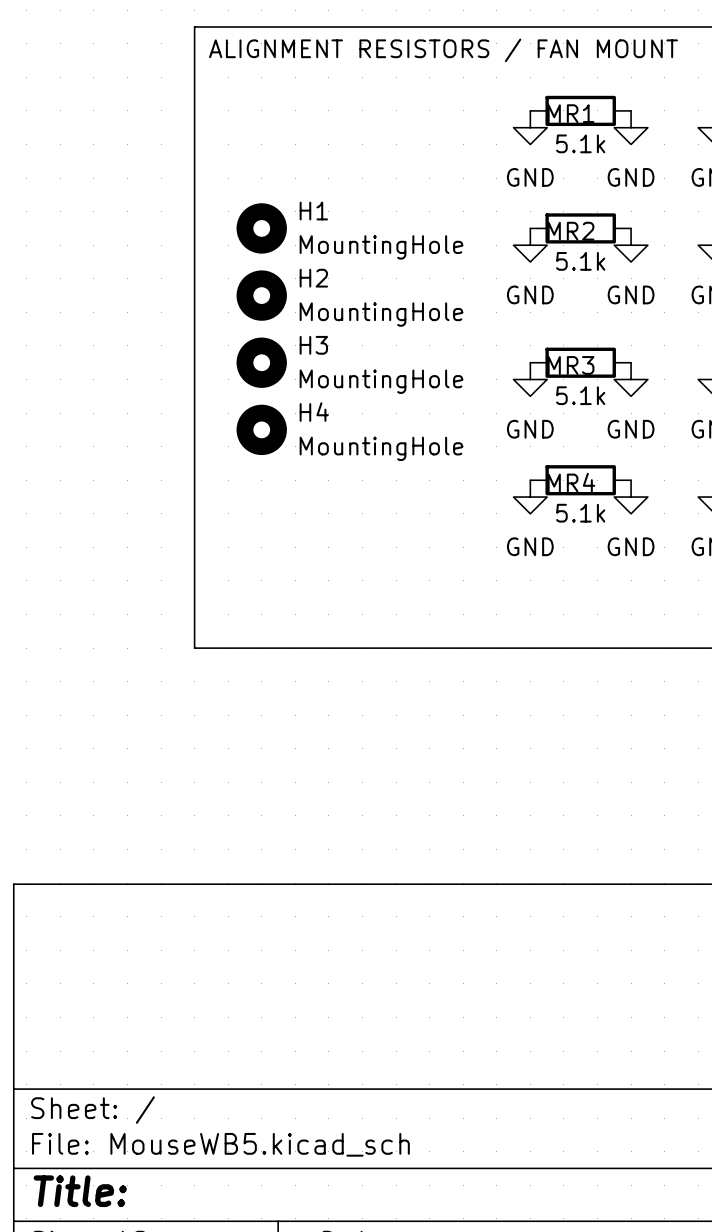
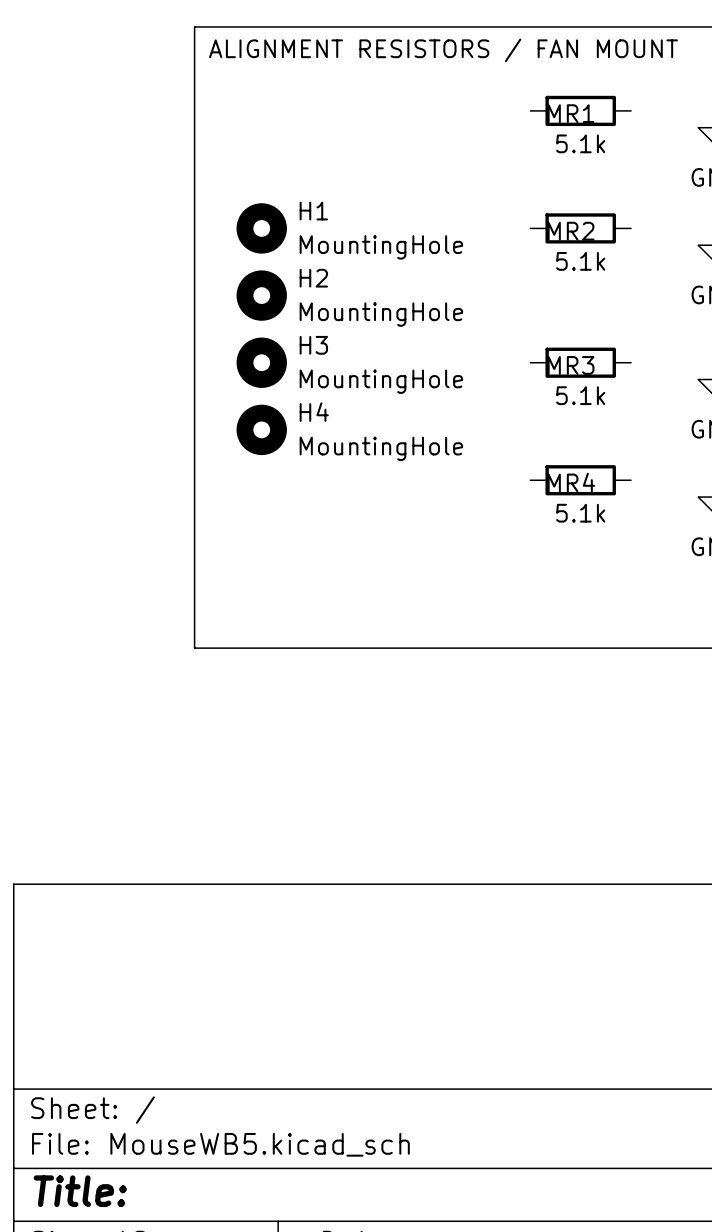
power symbol: GND (530, 127) -> none
power symbol: GND (631, 127) -> none
power symbol: GND (530, 245) -> none
power symbol: GND (631, 245) -> none
power symbol: GND (530, 379) -> none
power symbol: GND (631, 379) -> none
power symbol: GND (530, 497) -> none
power symbol: GND (631, 497) -> none

